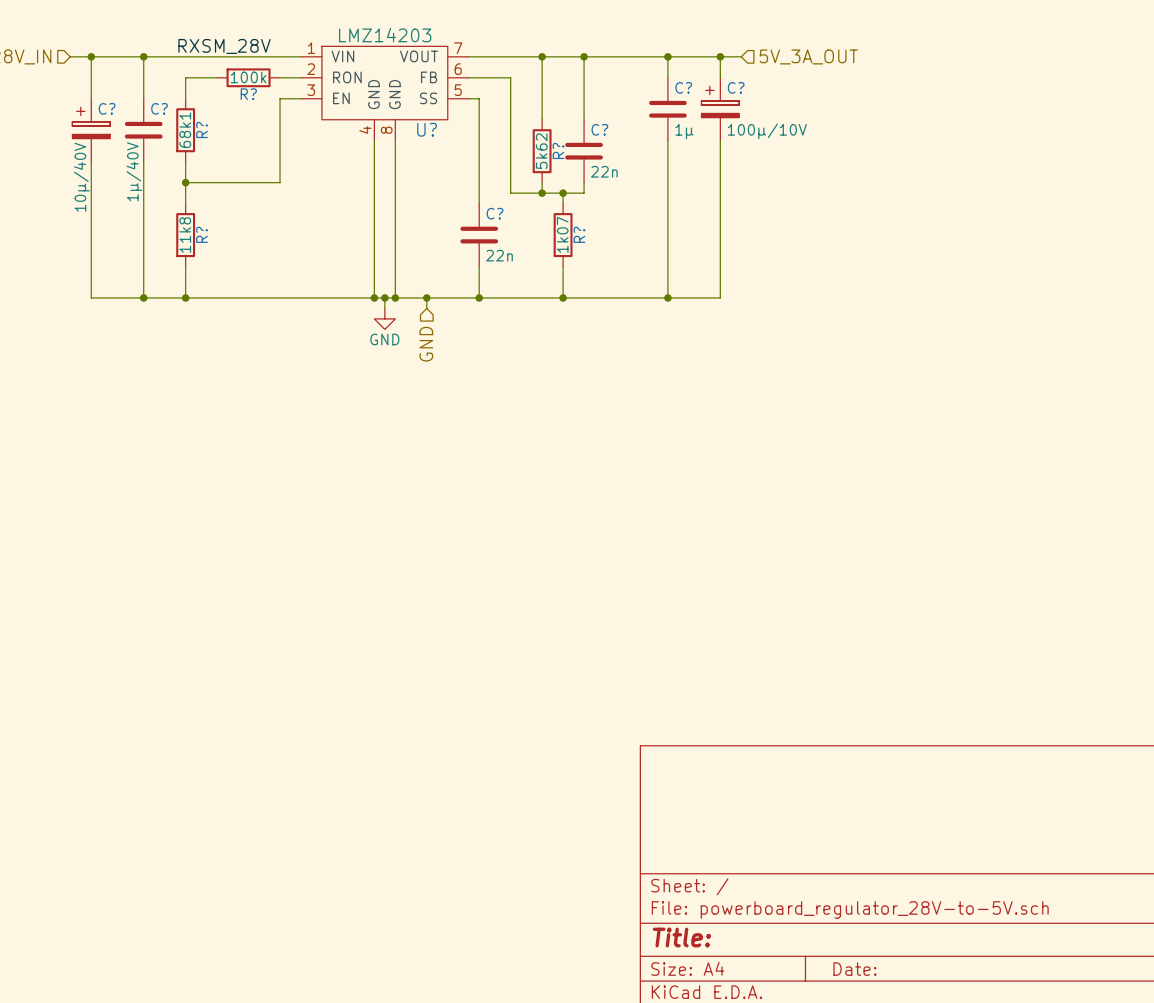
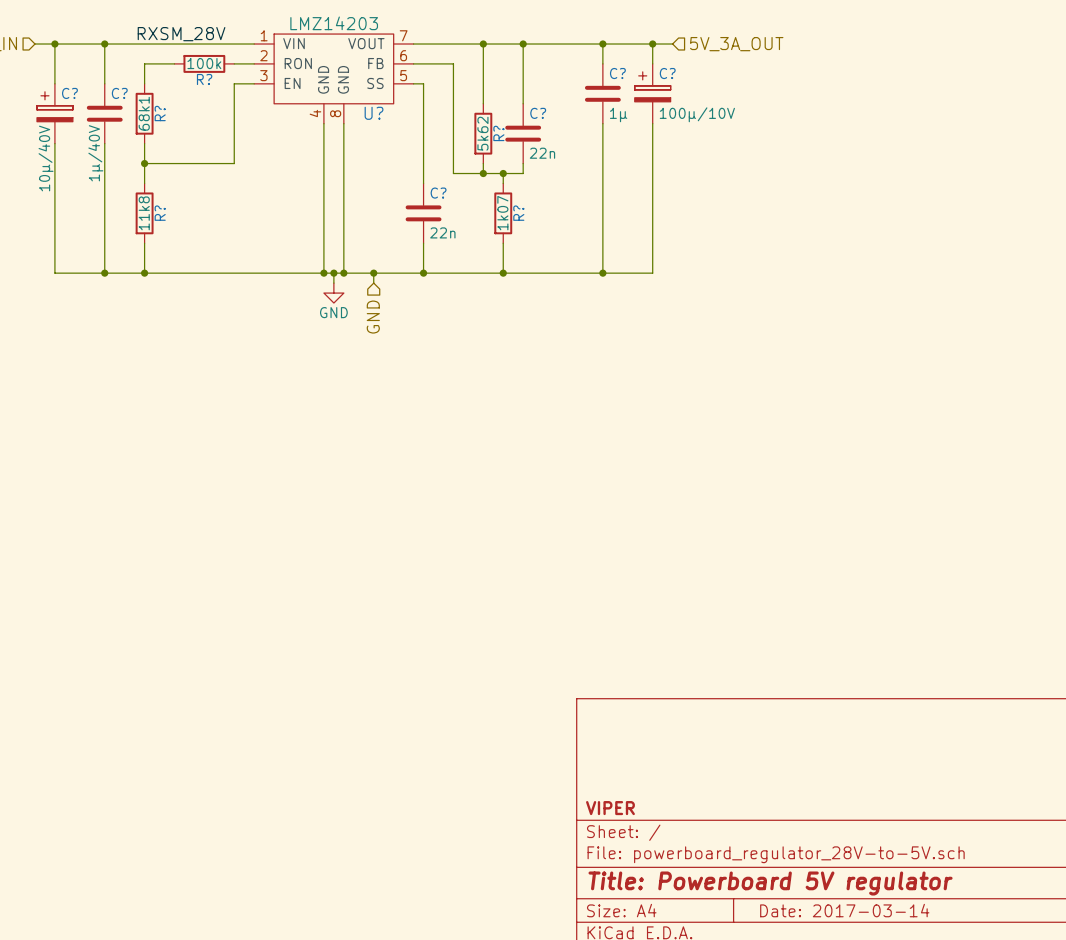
title block: none -> VIPER (610, 808)
title block: Title: (681, 937) -> Title: Powerboard 5V regulator (770, 883)
title block: Date: (854, 969) -> Date: 2017-03-14 (844, 910)

